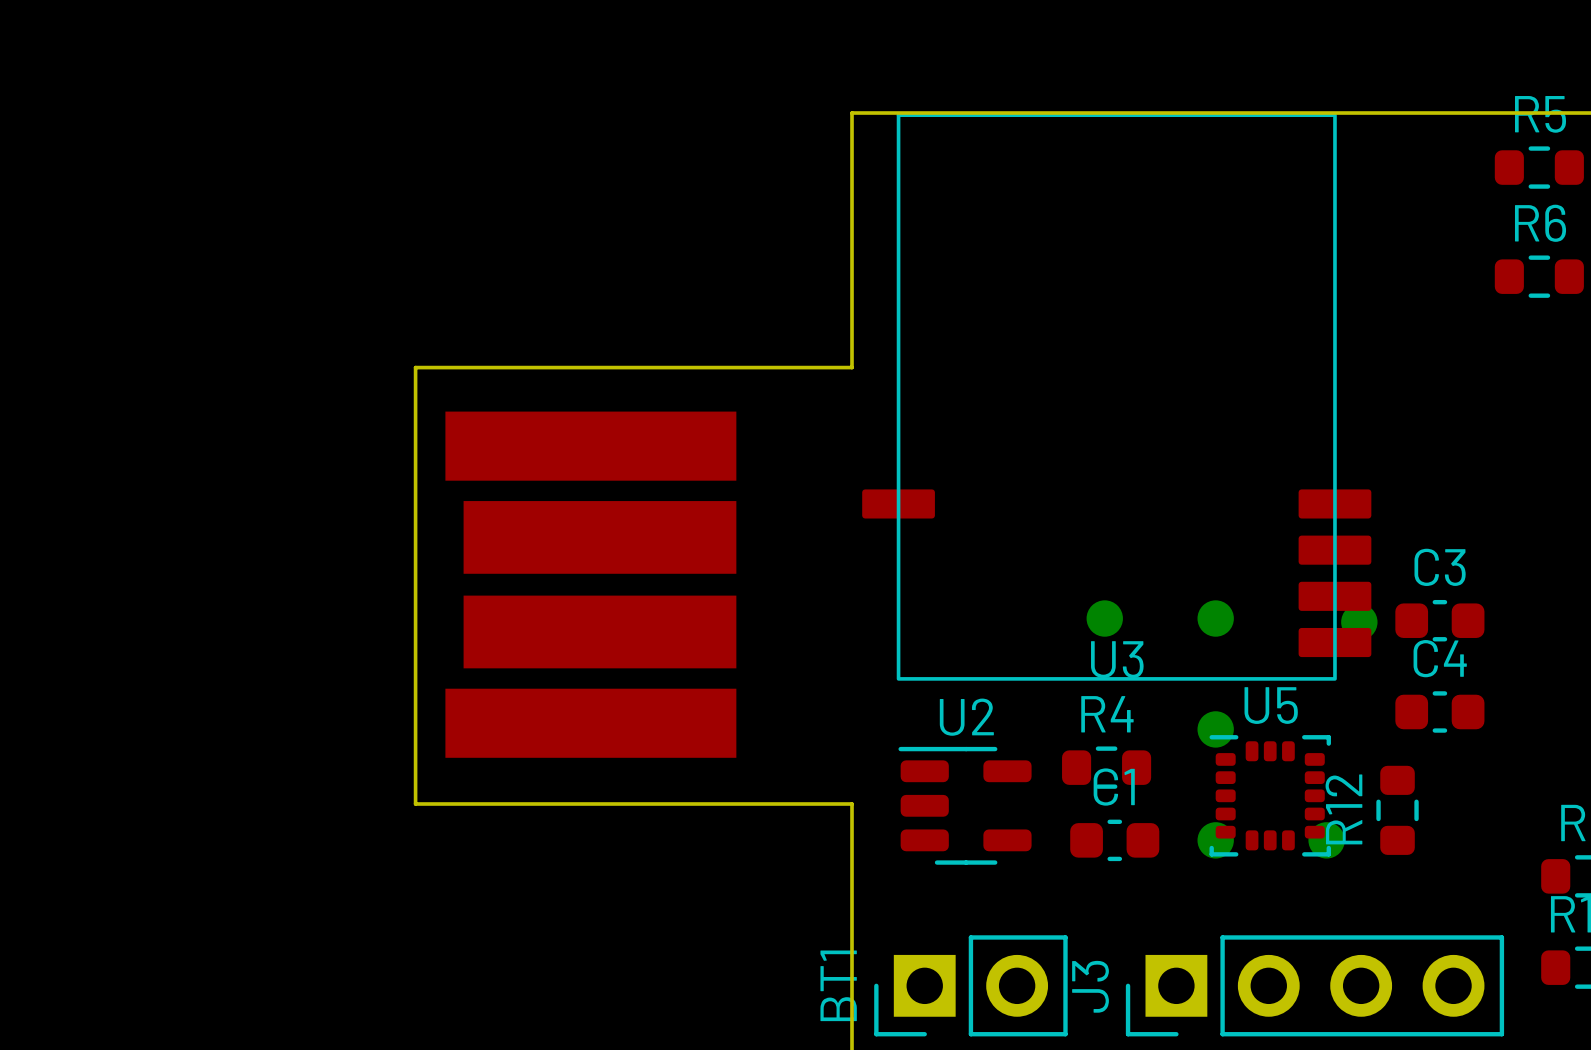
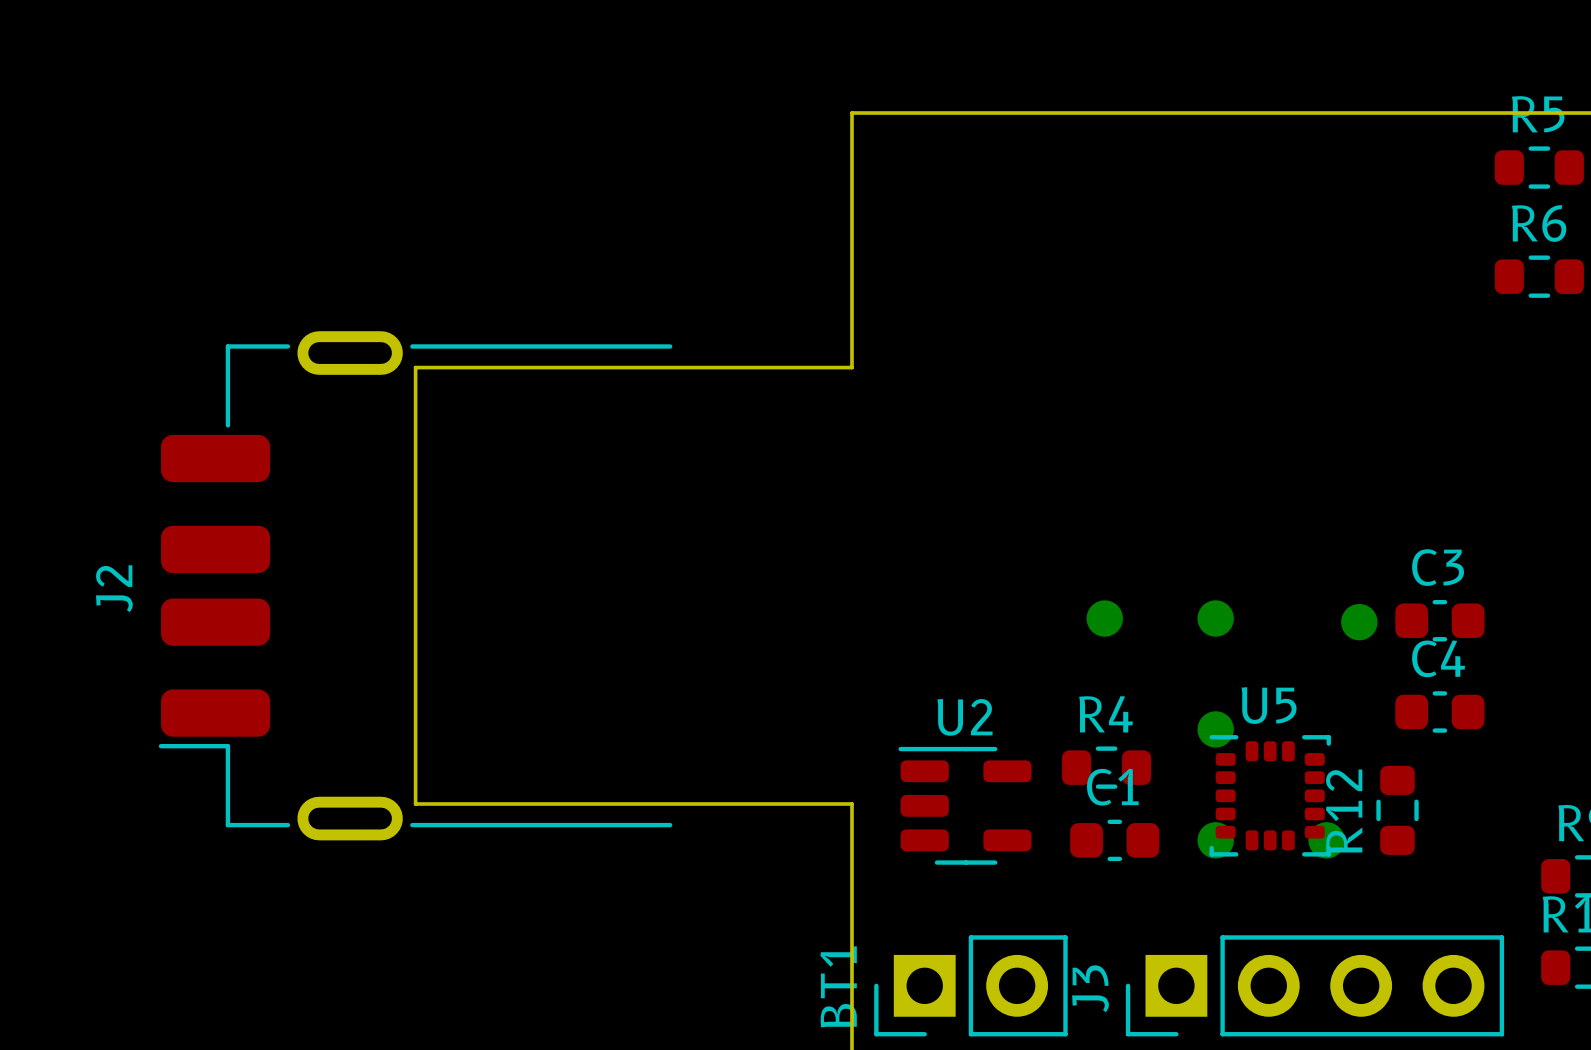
U3: (1116, 397) -> none
part: (590, 584) -> none
J2: none -> (415, 585)

